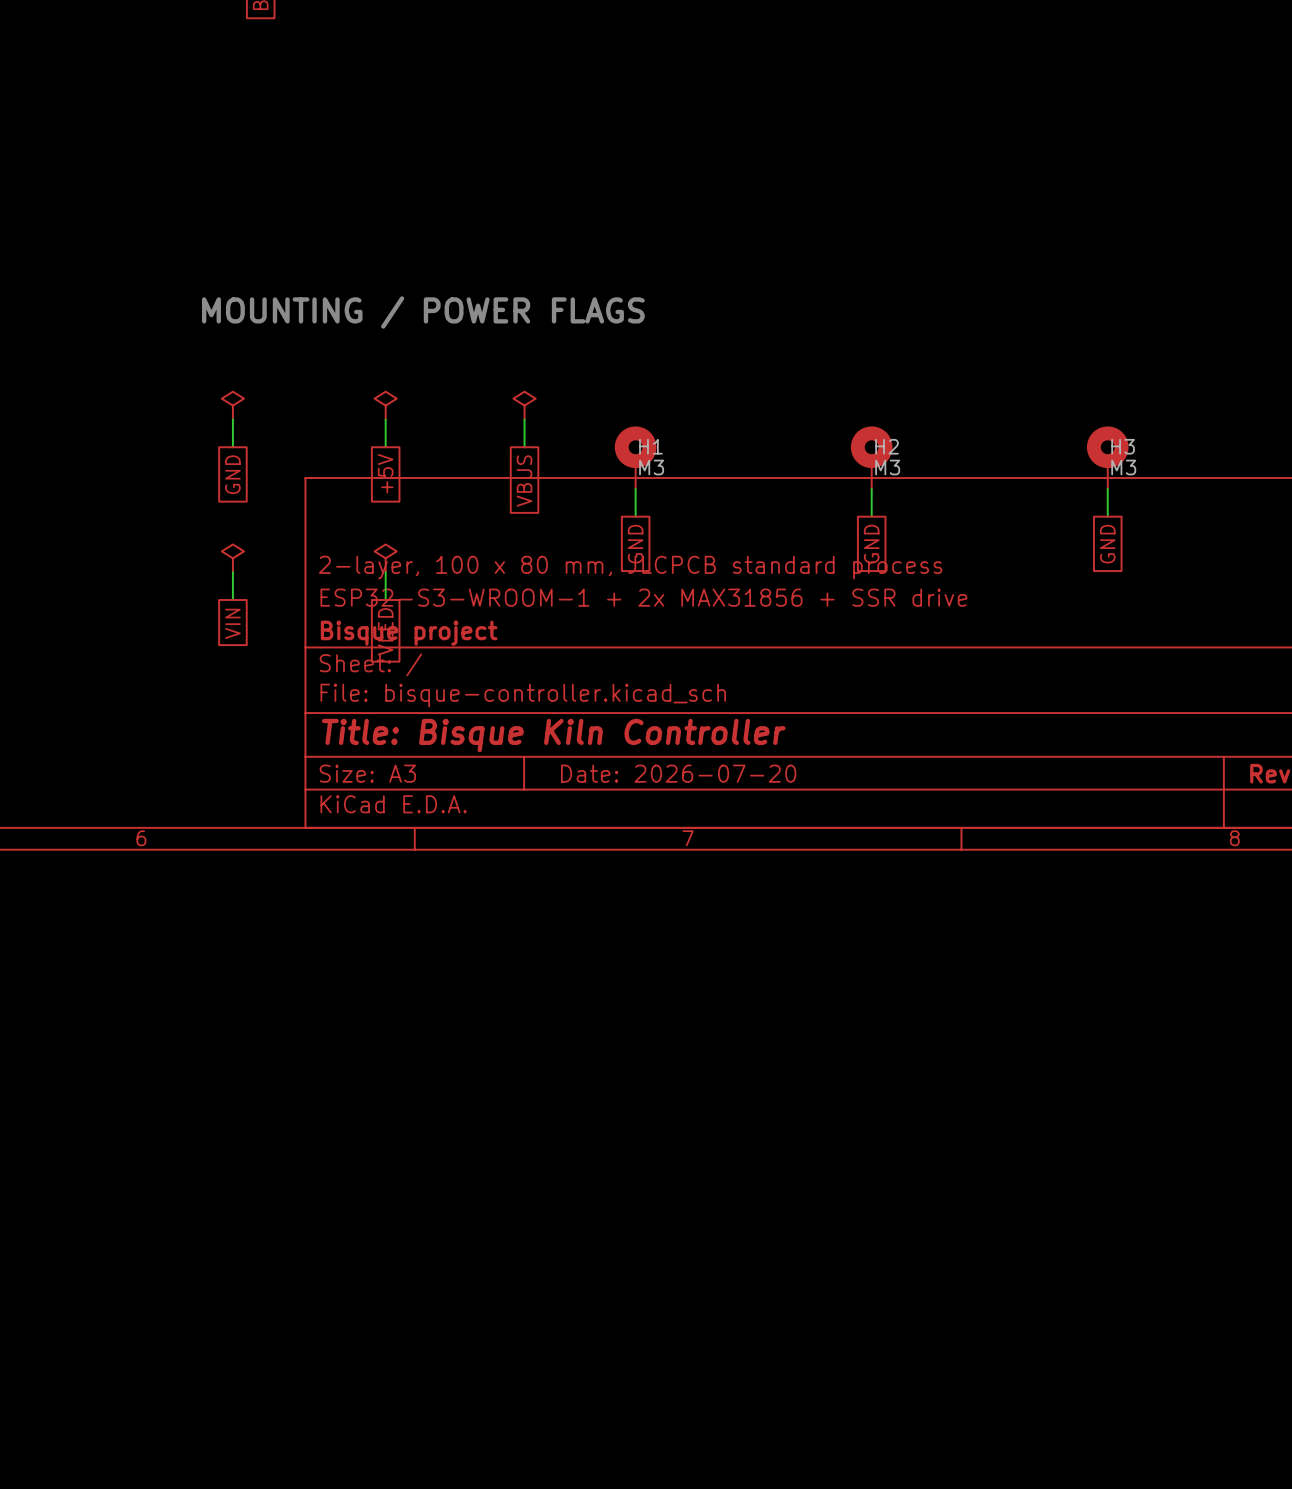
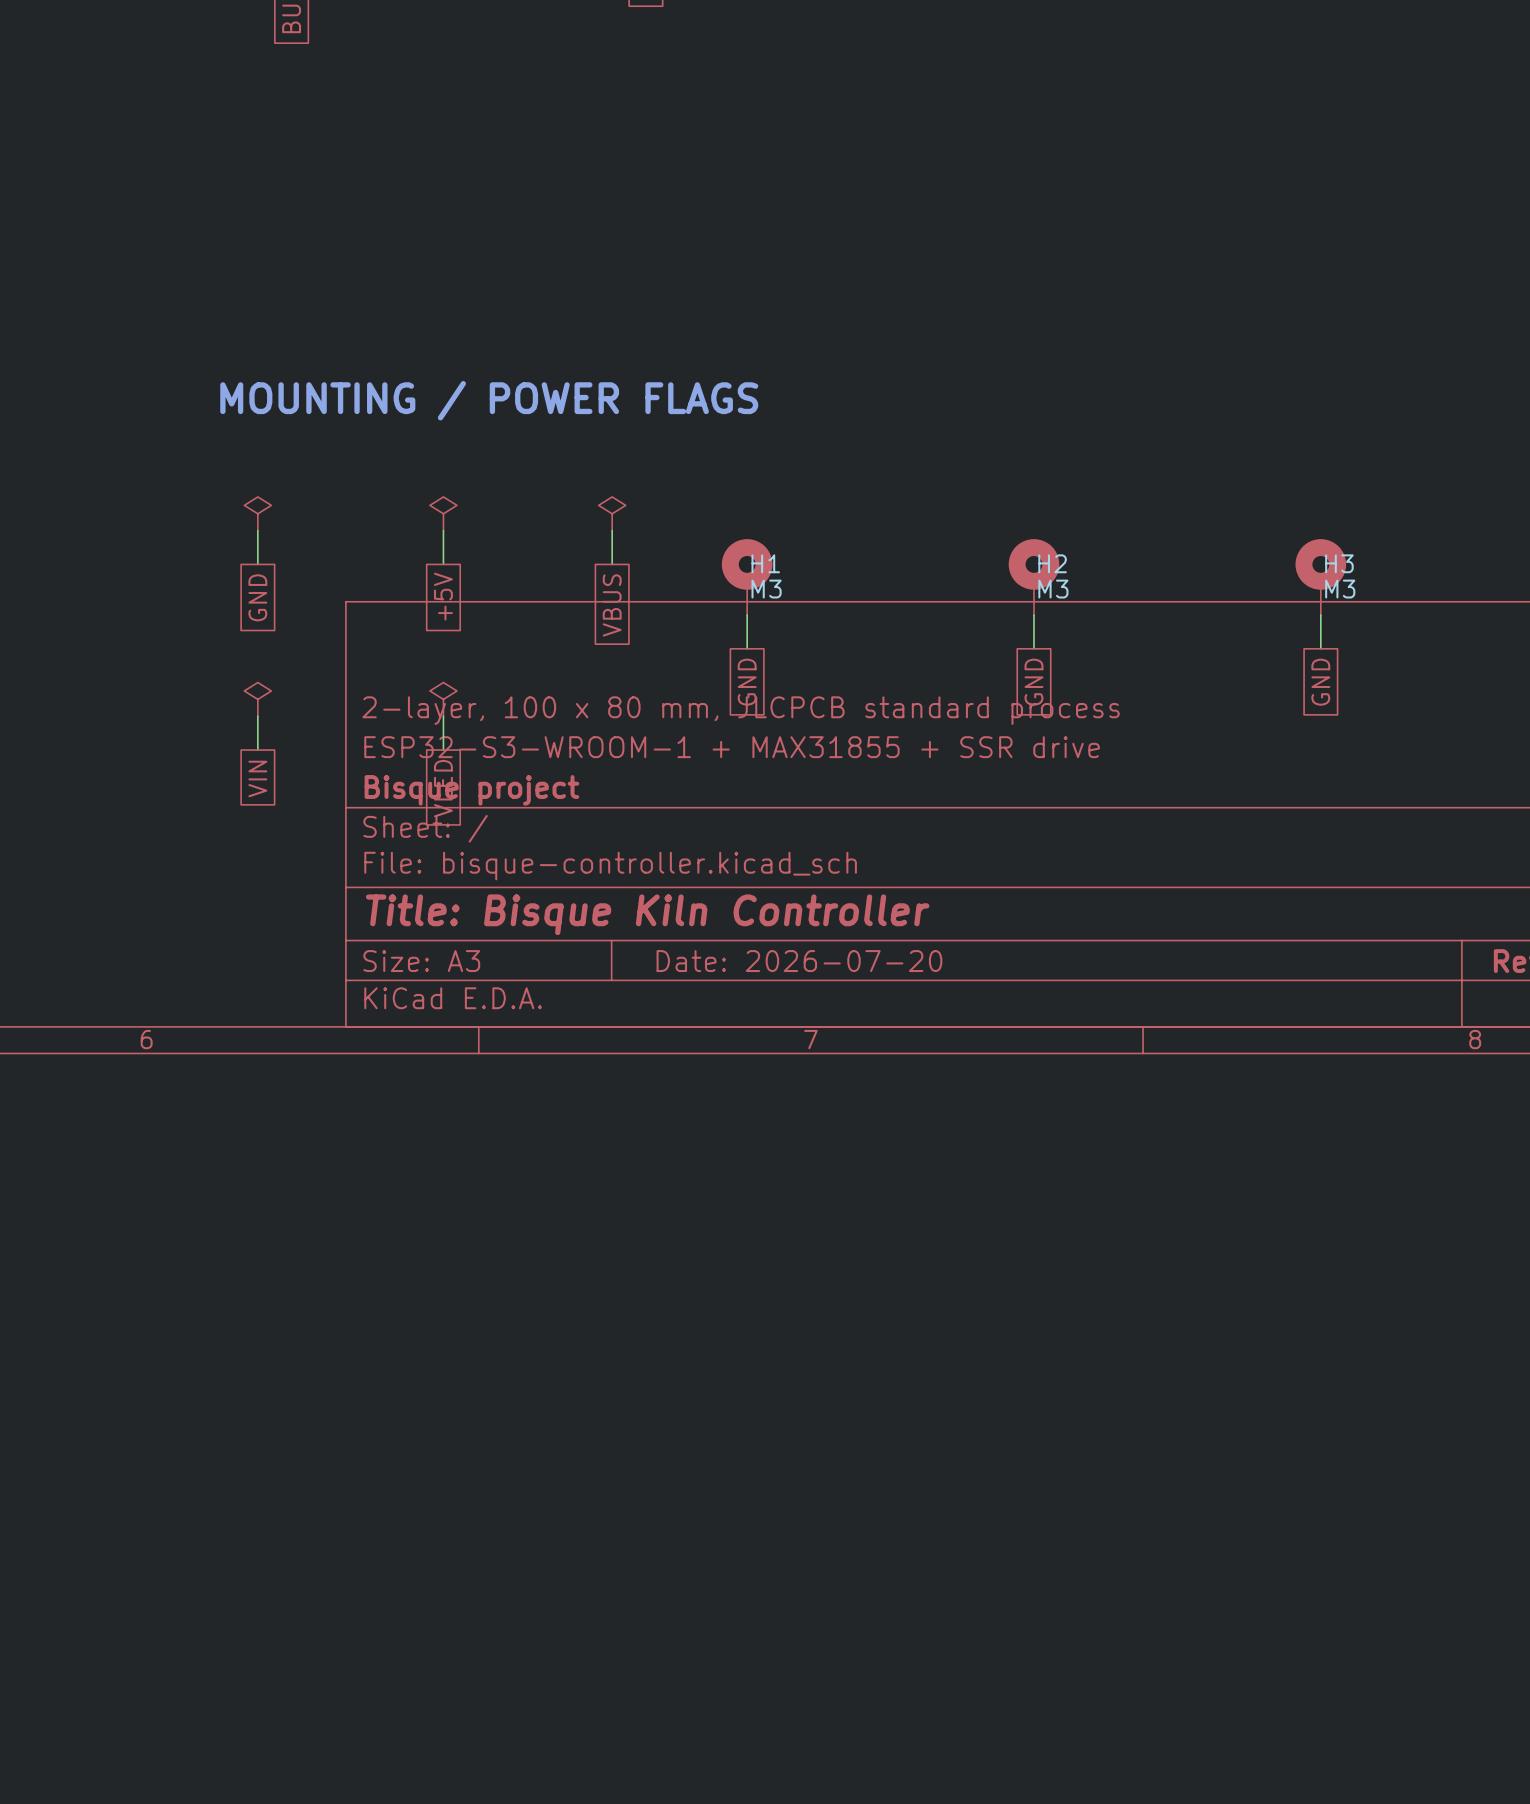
title block: ESP32-S3-WROOM-1 + 2x MAX31856 + SSR drive (643, 597) -> ESP32-S3-WROOM-1 + MAX31855 + SSR drive (732, 747)

